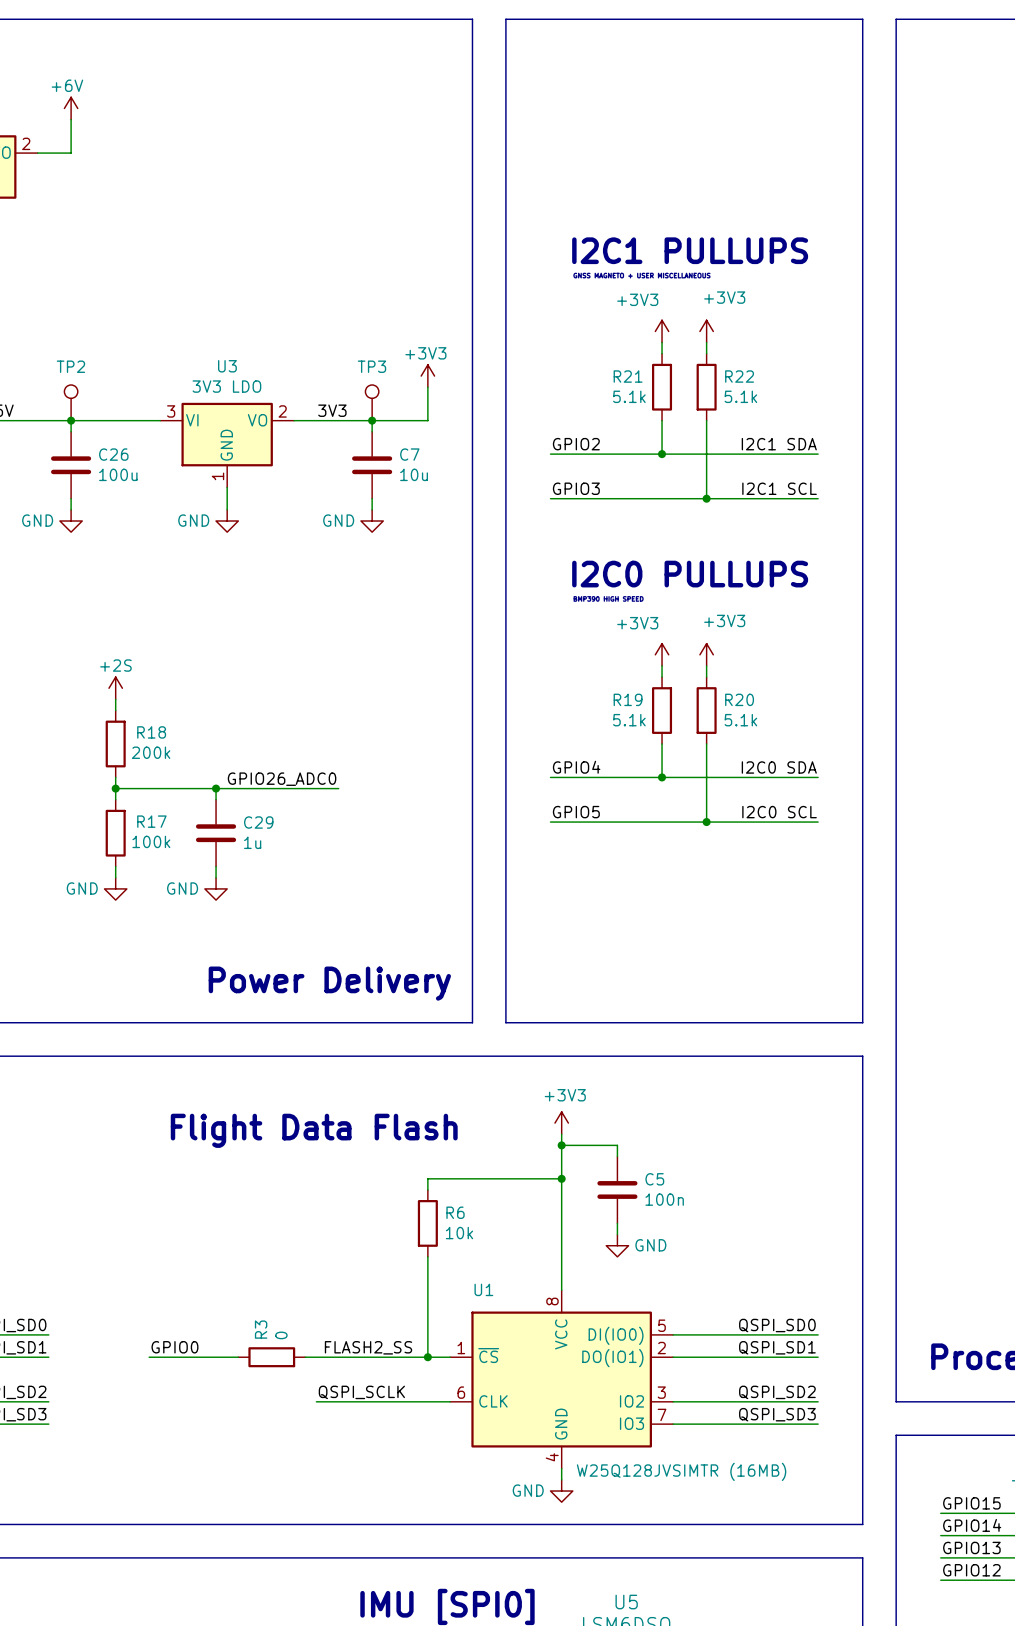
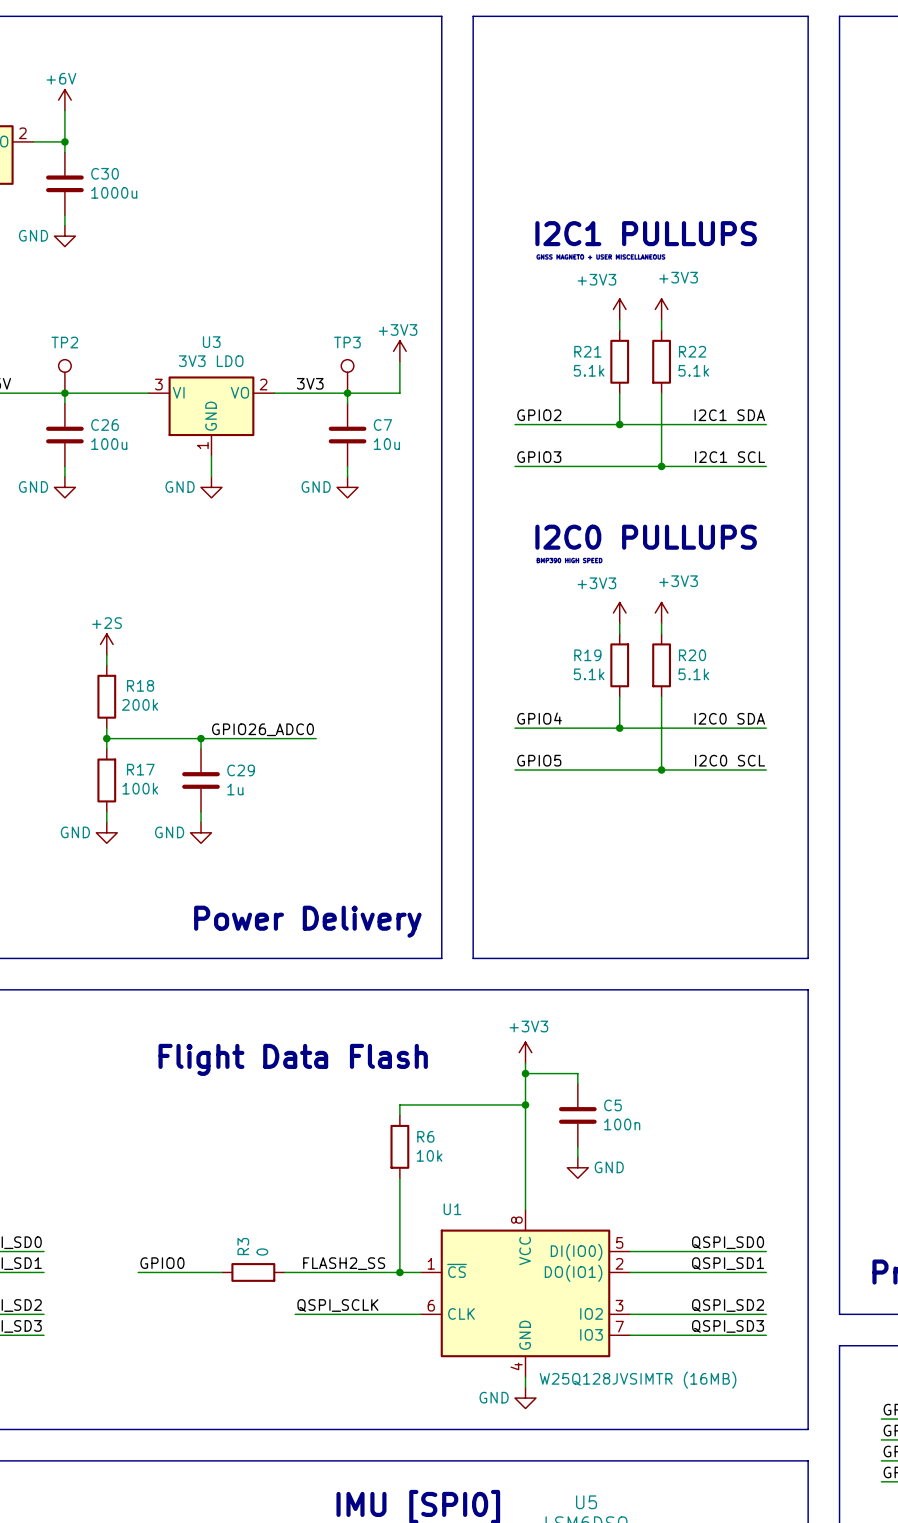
wire: none -> (64, 141) (64, 152)
junction: none -> (64, 141)
C30: none -> 1000u (64, 183)
wire: none -> (64, 215) (64, 225)
power symbol: none -> GND (64, 236)

